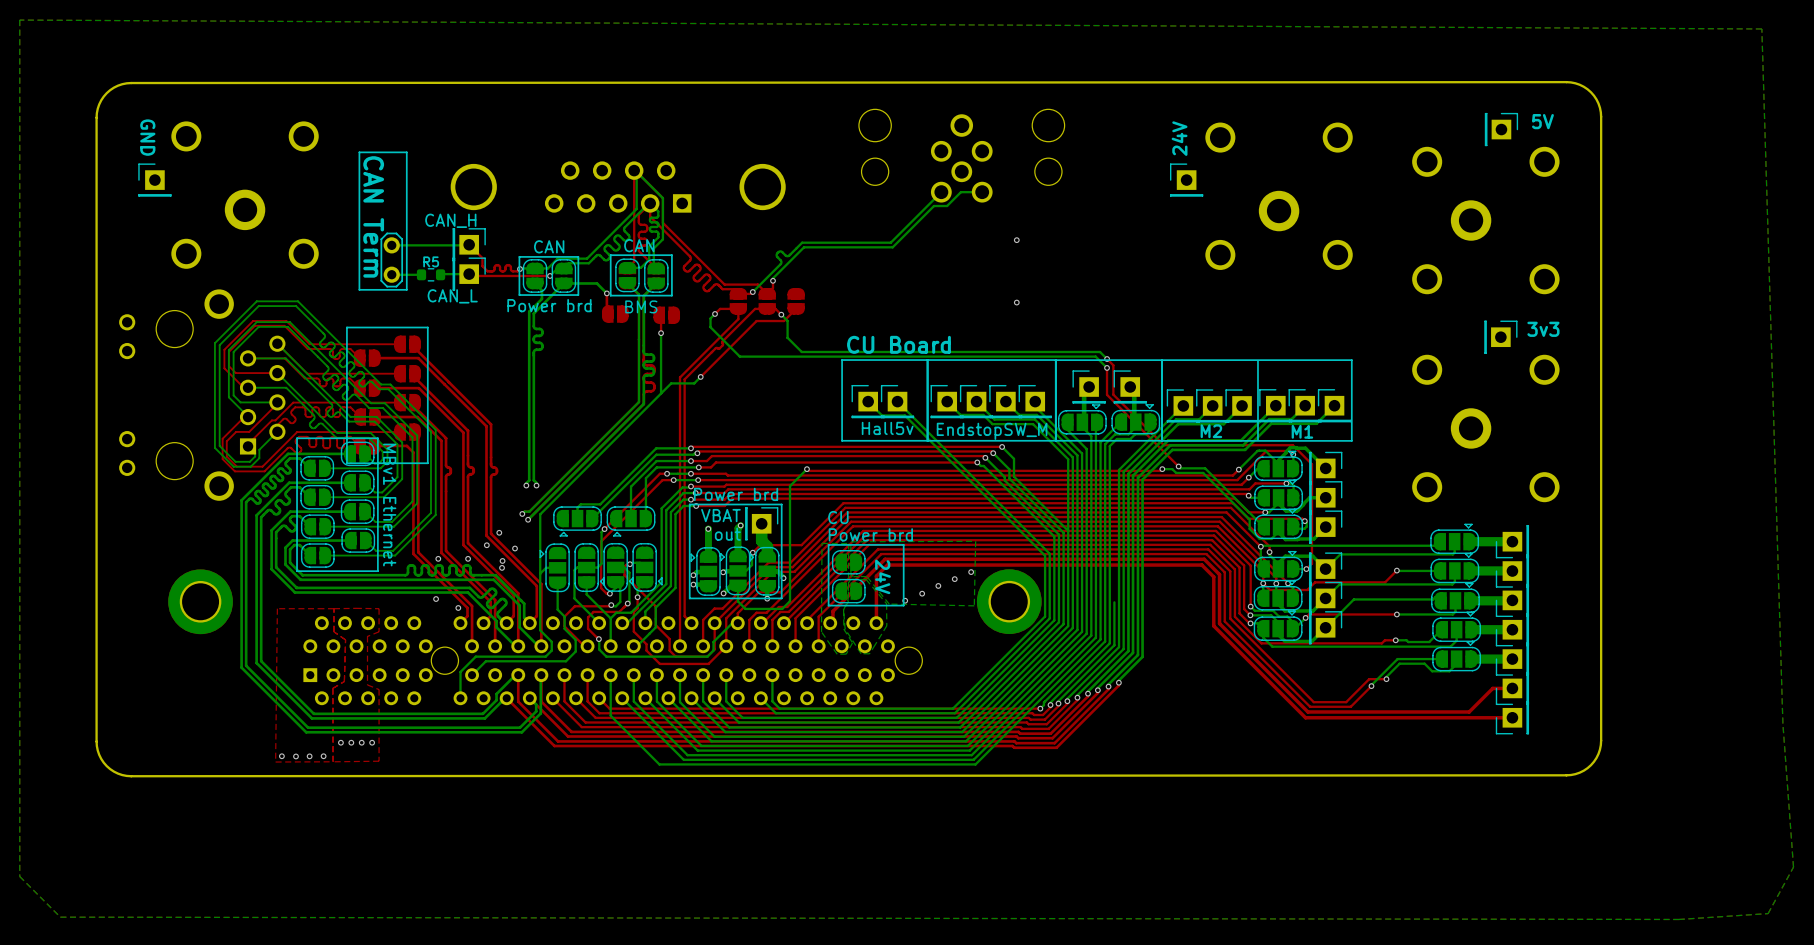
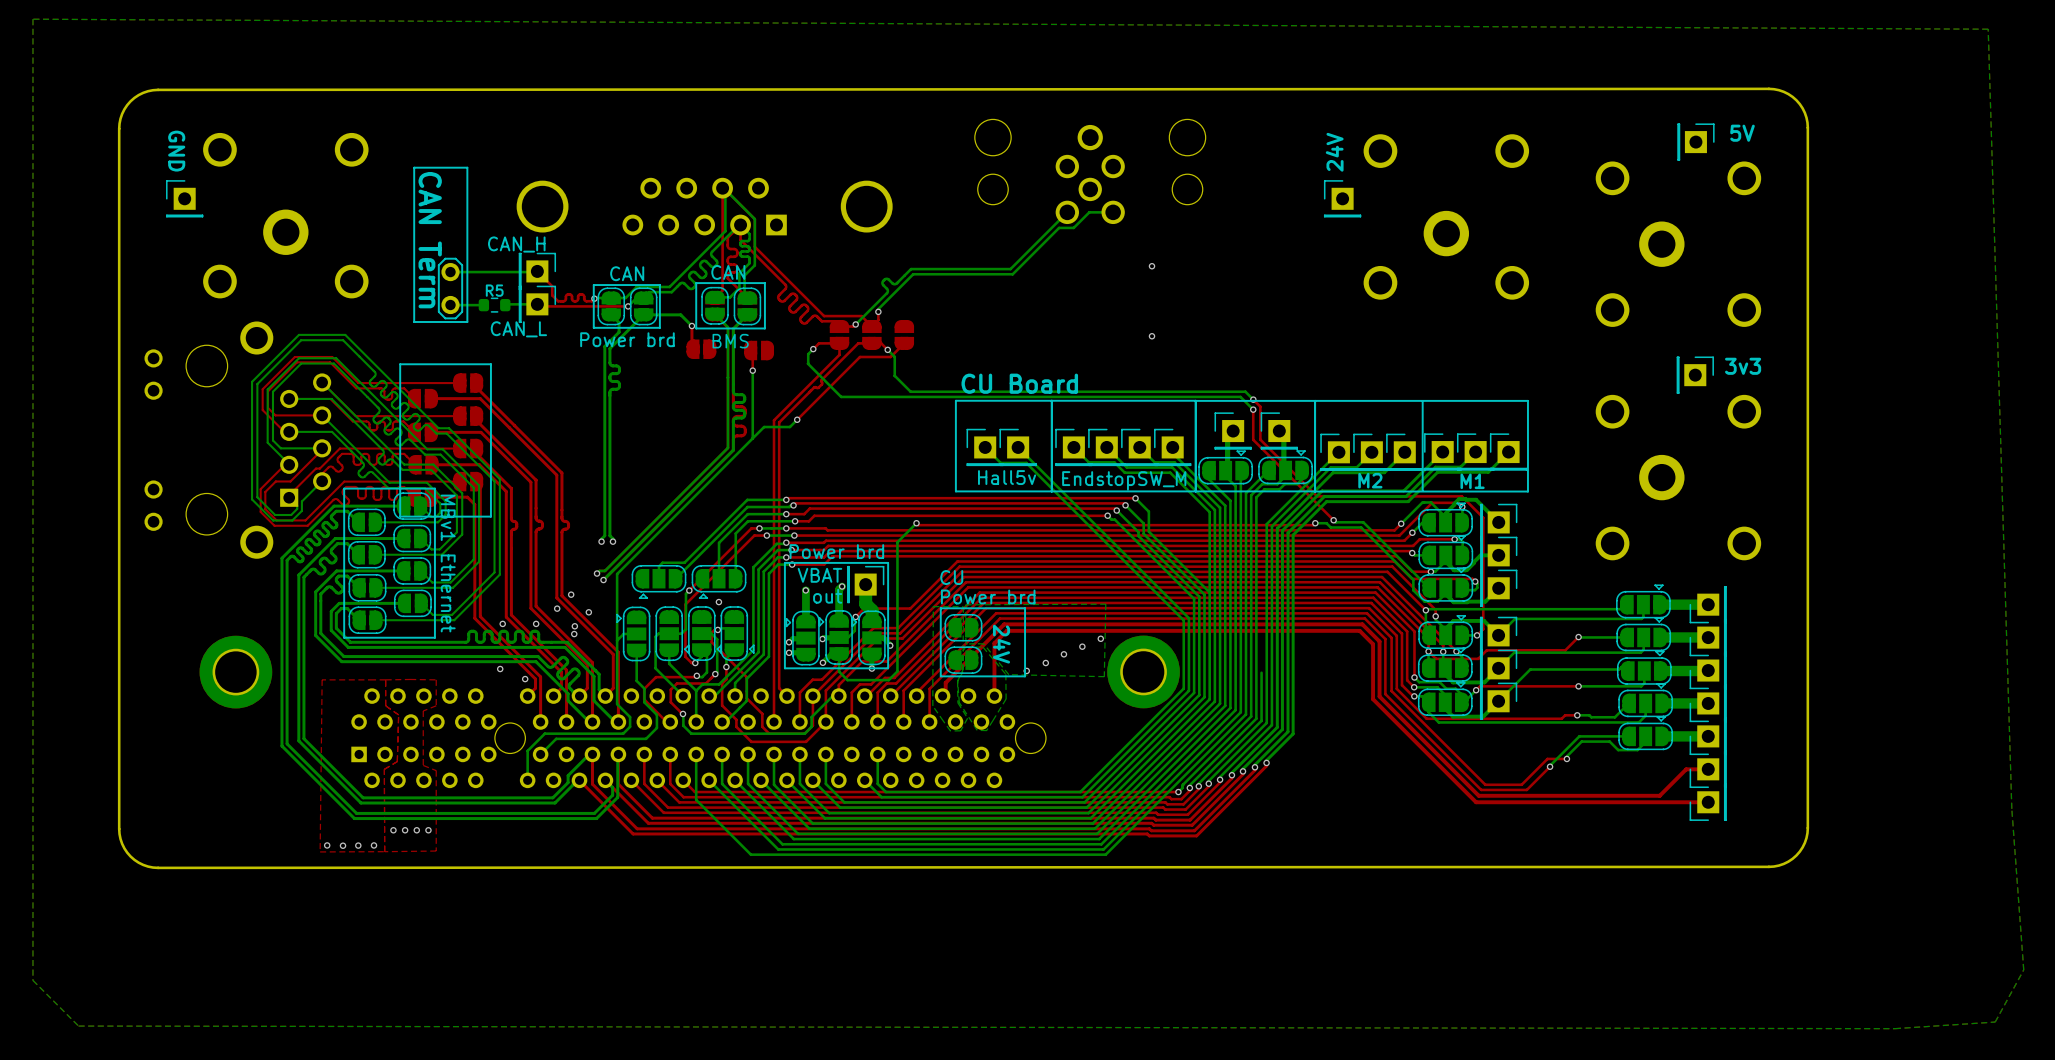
via: none -> (718, 602)

